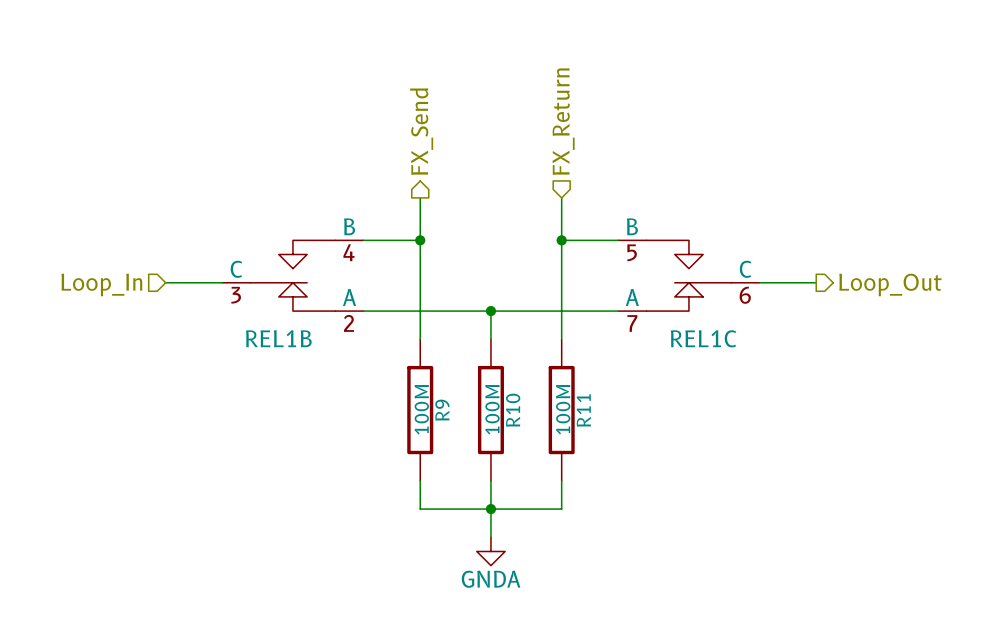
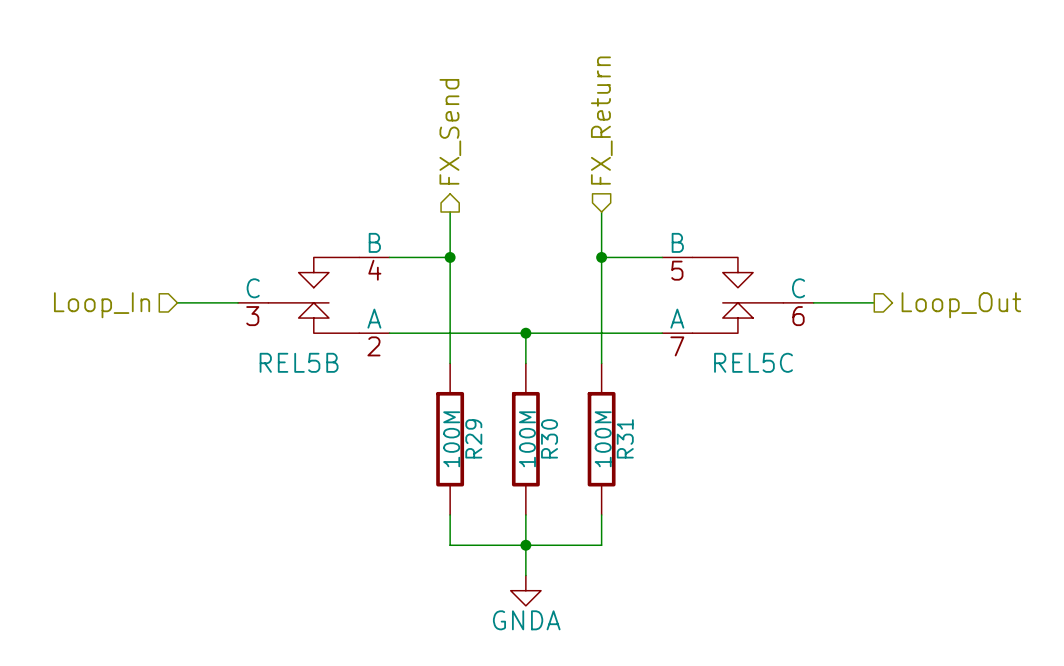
REL1B name: REL1B (278, 338) -> REL5B (299, 362)
REL1C name: REL1C (703, 338) -> REL5C (753, 362)
R9 name: R9 (442, 410) -> R29 (473, 438)
R10 name: R10 (513, 410) -> R30 (549, 438)
R11 name: R11 (583, 410) -> R31 (625, 438)

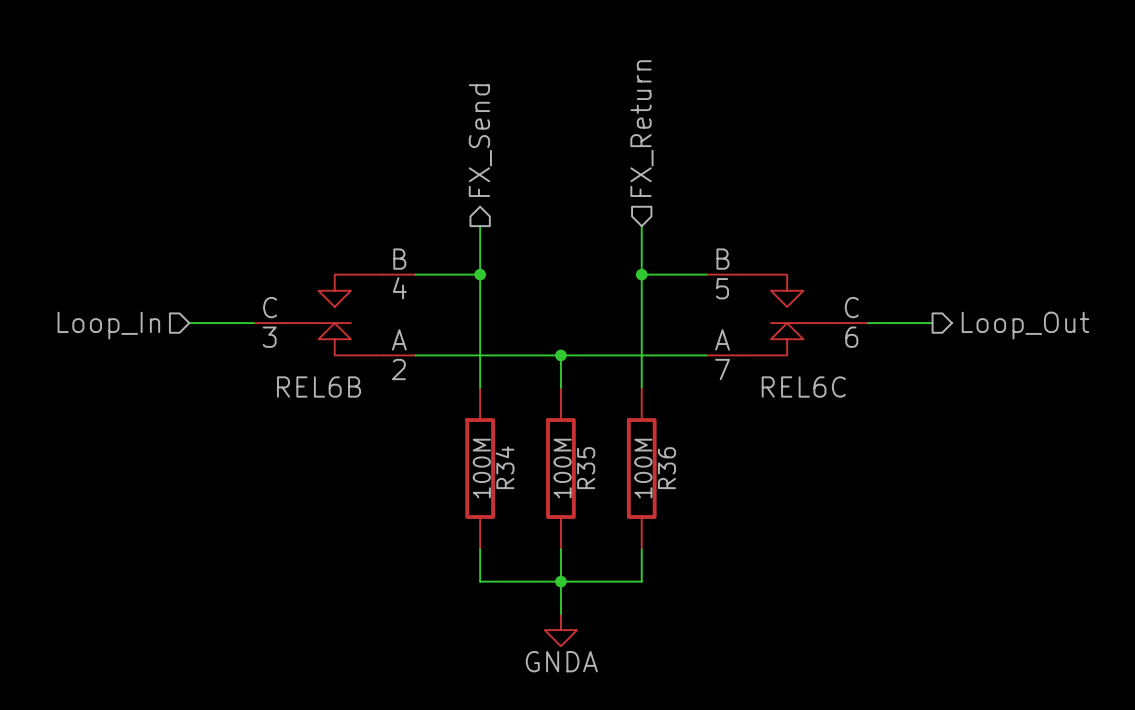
REL5B name: REL5B (299, 362) -> REL6B (319, 387)
REL5C name: REL5C (753, 362) -> REL6C (803, 387)
R29 name: R29 (473, 438) -> R34 (505, 467)
R30 name: R30 (549, 438) -> R35 (586, 468)
R31 name: R31 (625, 438) -> R36 (666, 468)

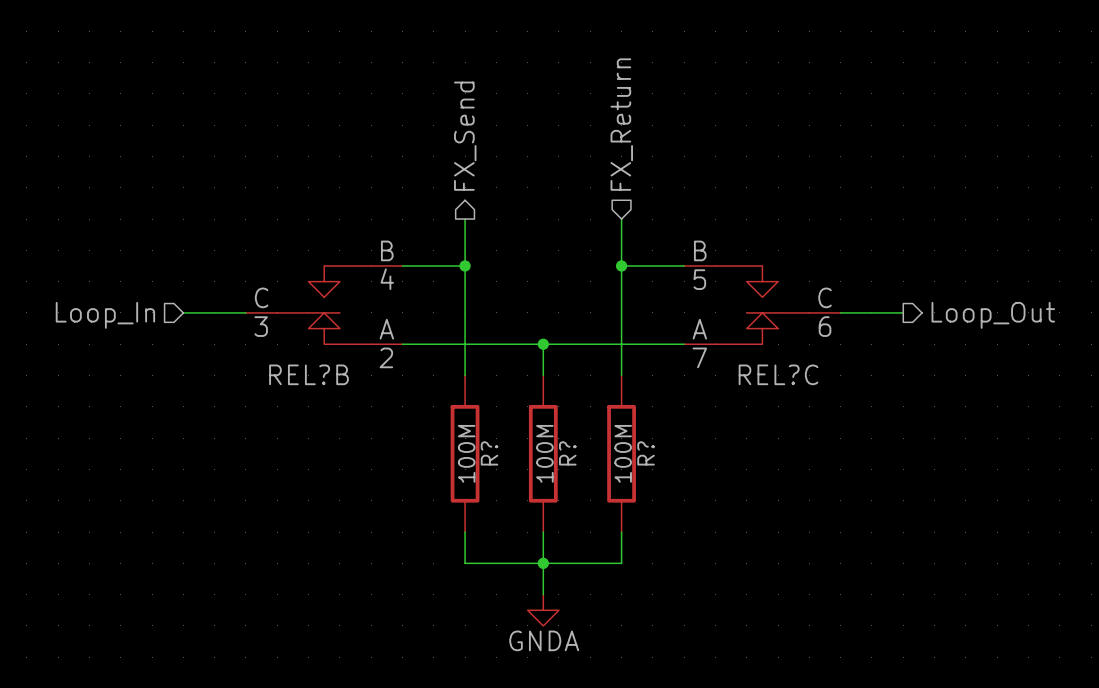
REL6B name: REL6B (319, 387) -> REL?B (309, 374)
REL6C name: REL6C (803, 387) -> REL?C (778, 374)
R34 name: R34 (505, 467) -> R? (489, 453)
R35 name: R35 (586, 468) -> R? (567, 453)
R36 name: R36 (666, 468) -> R? (646, 453)

